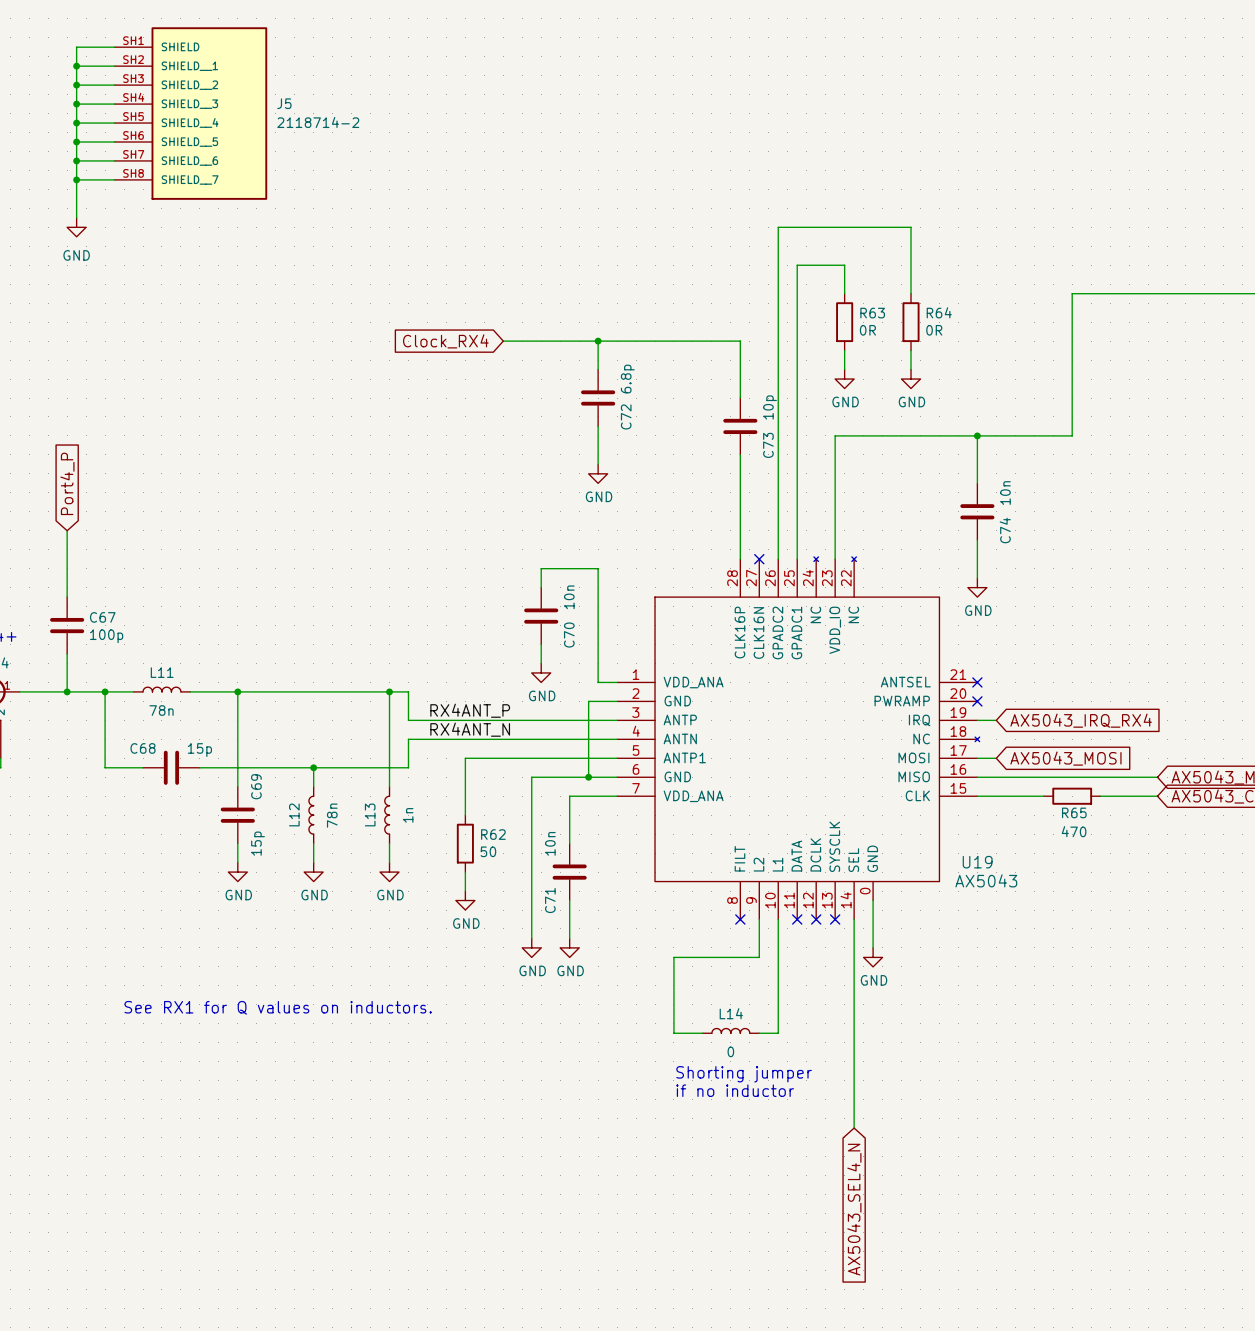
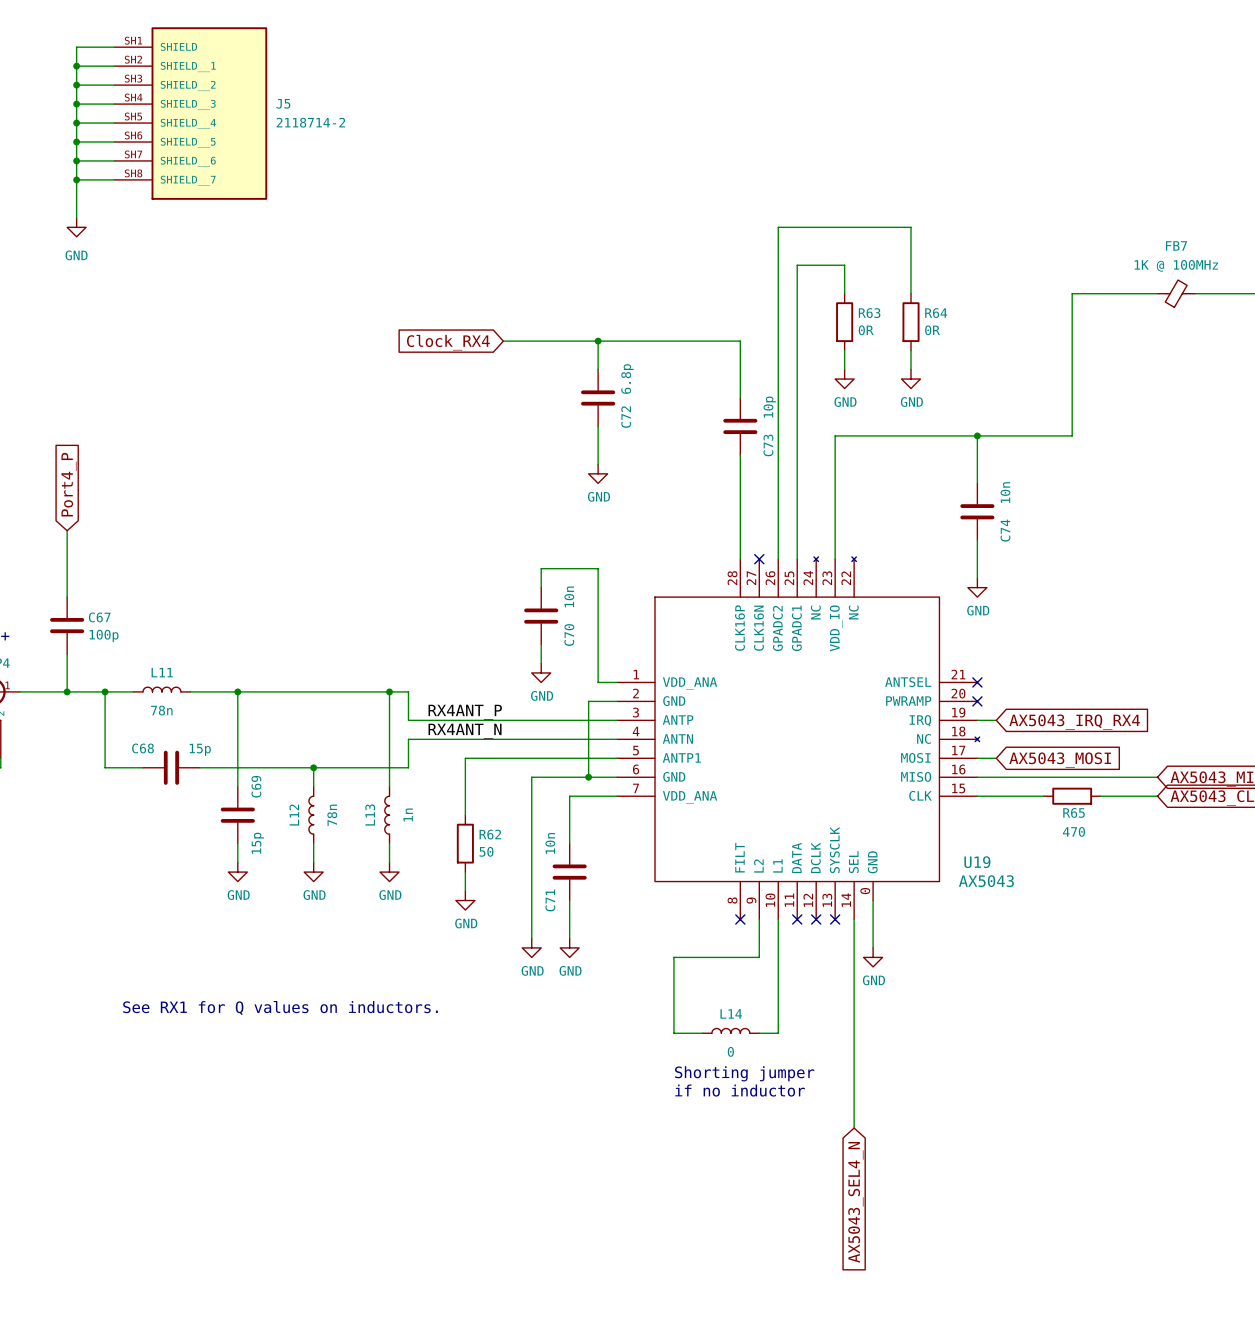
FB7: none -> 1K @ 100MHz (1176, 293)

